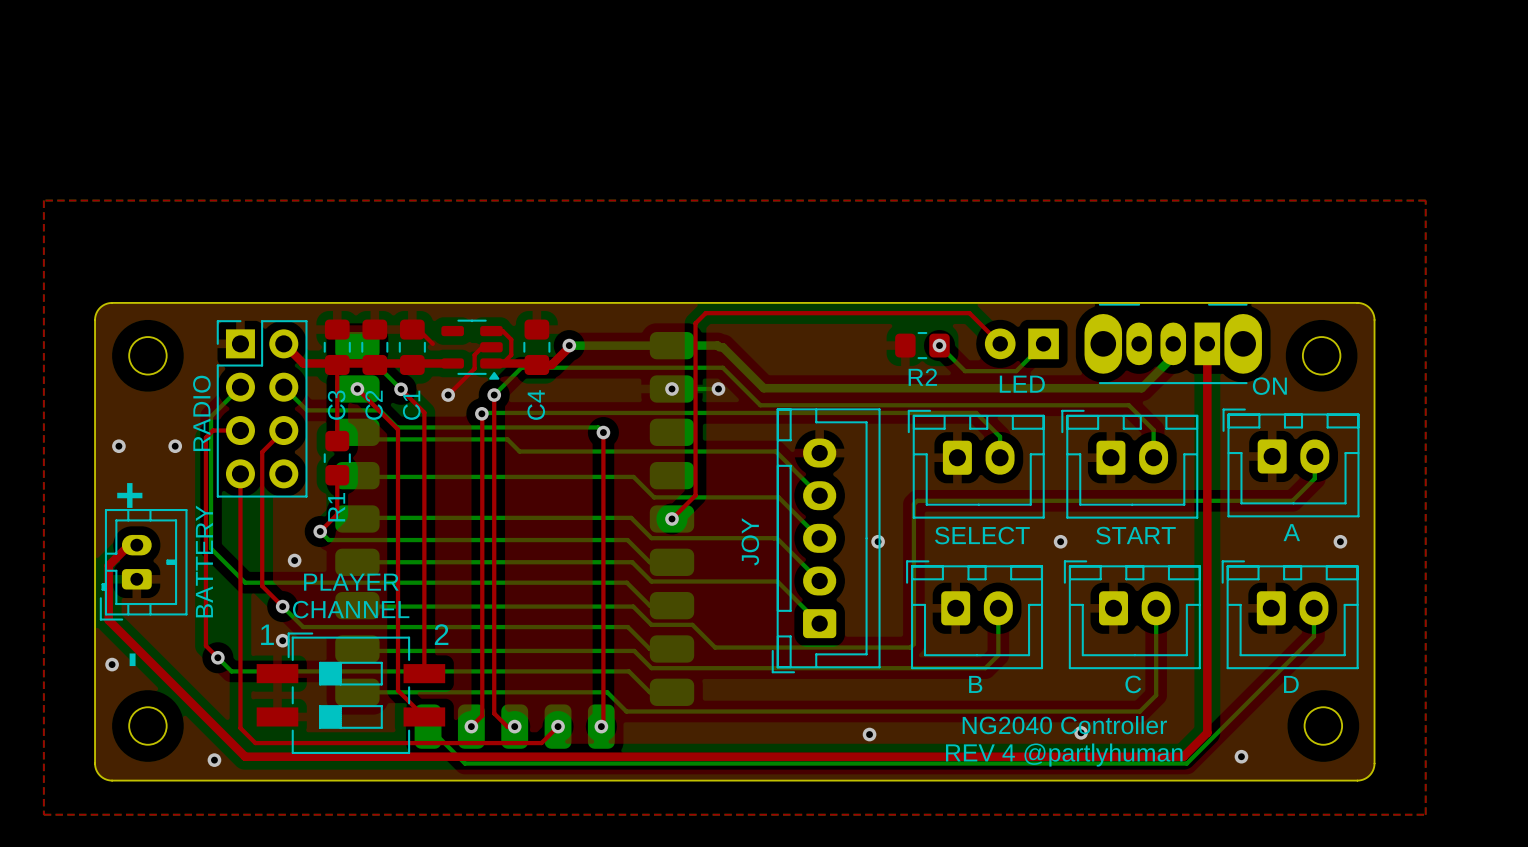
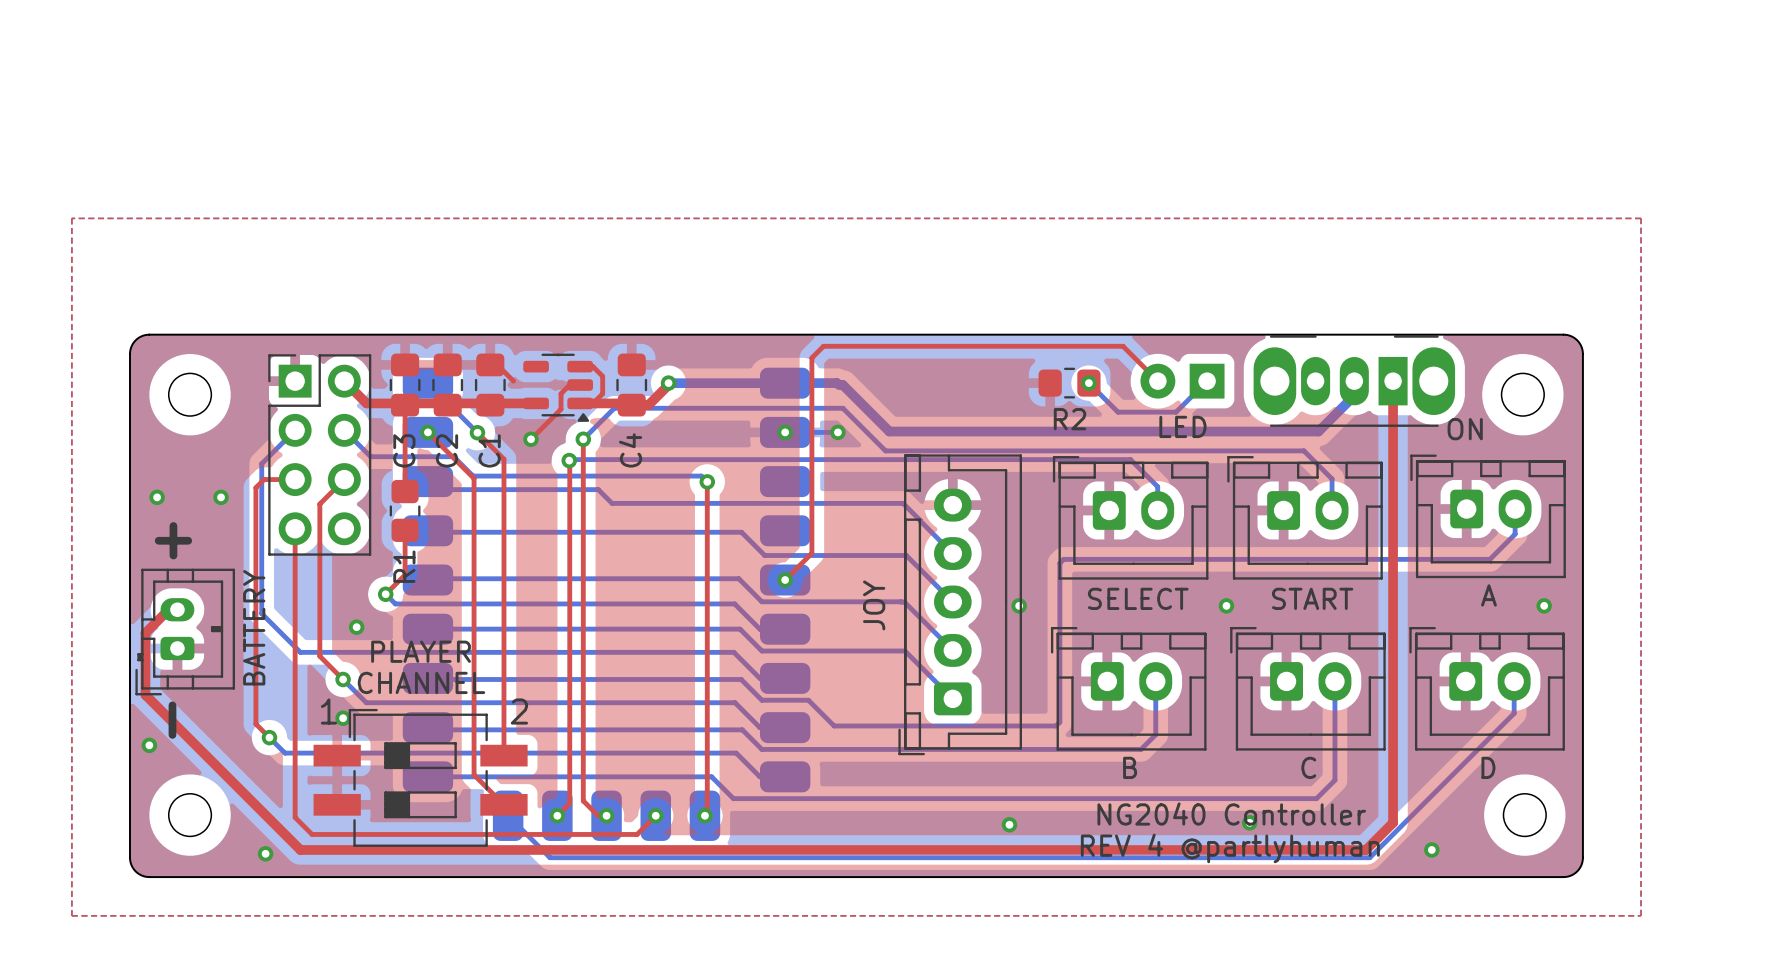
part value: RADIO (201, 413) -> none

